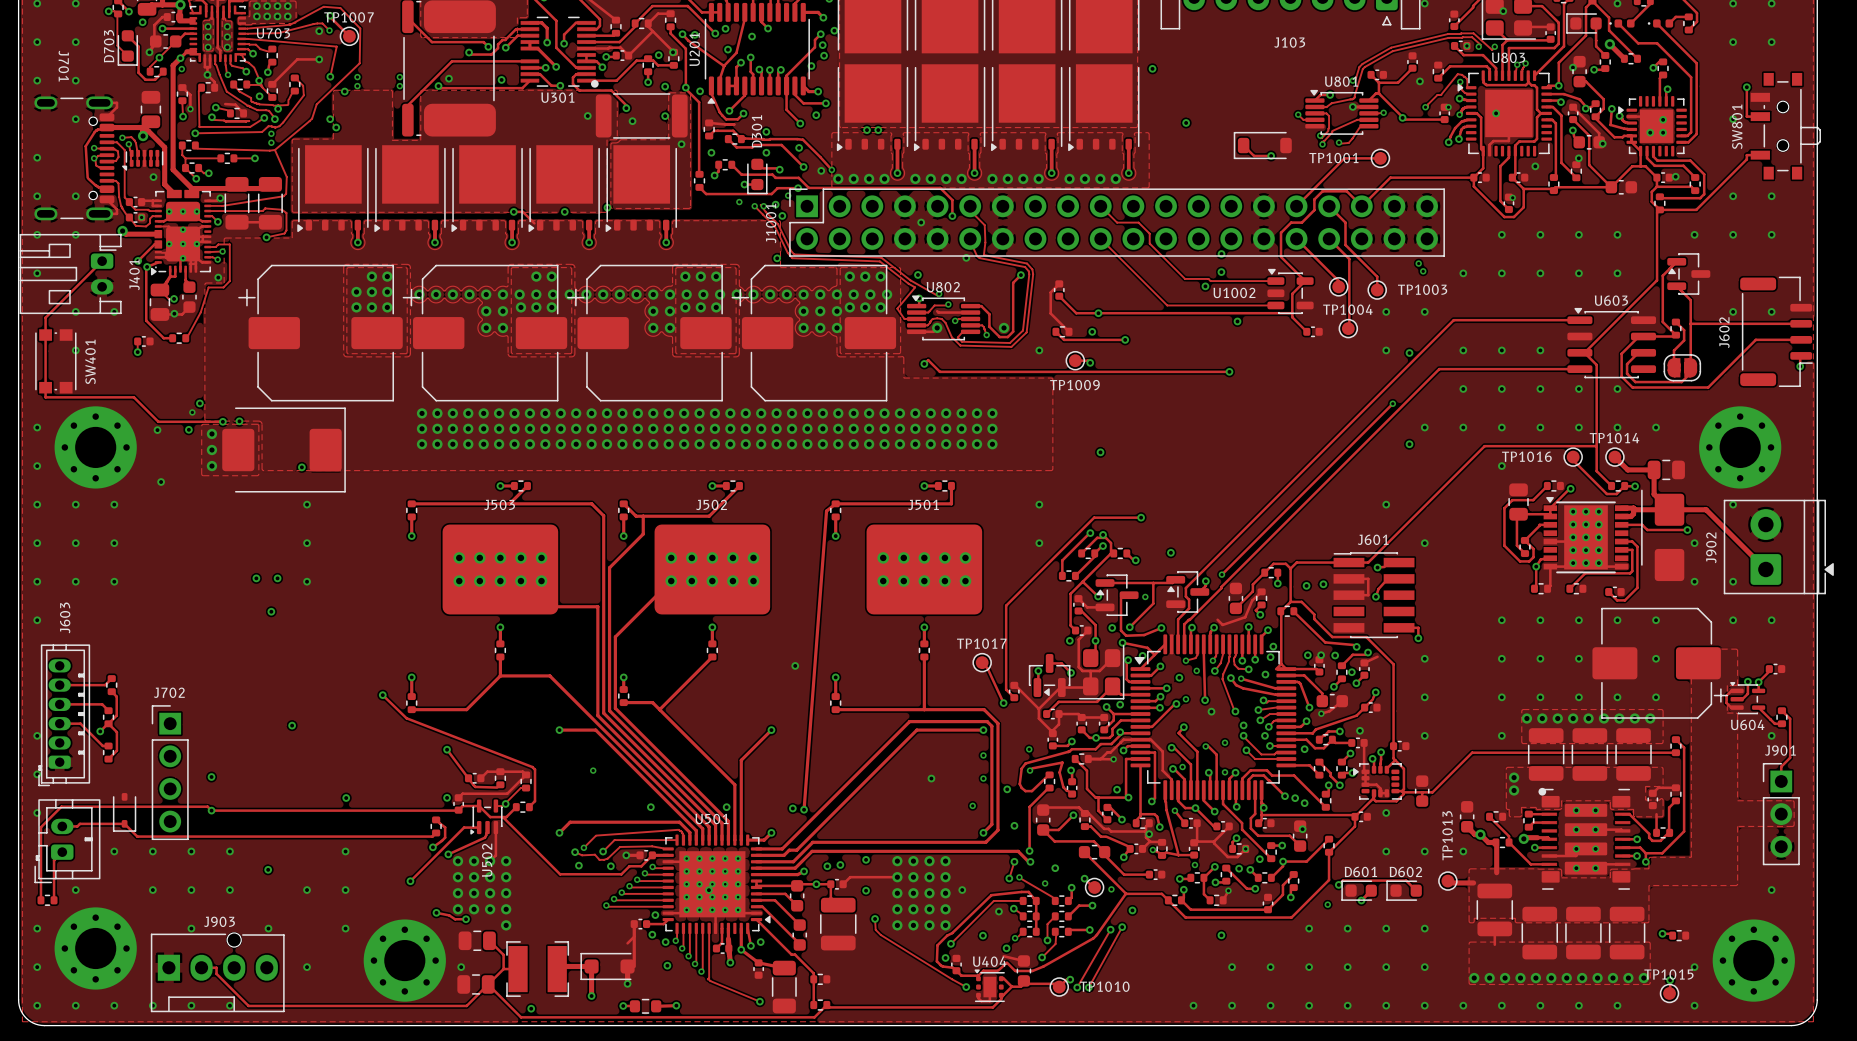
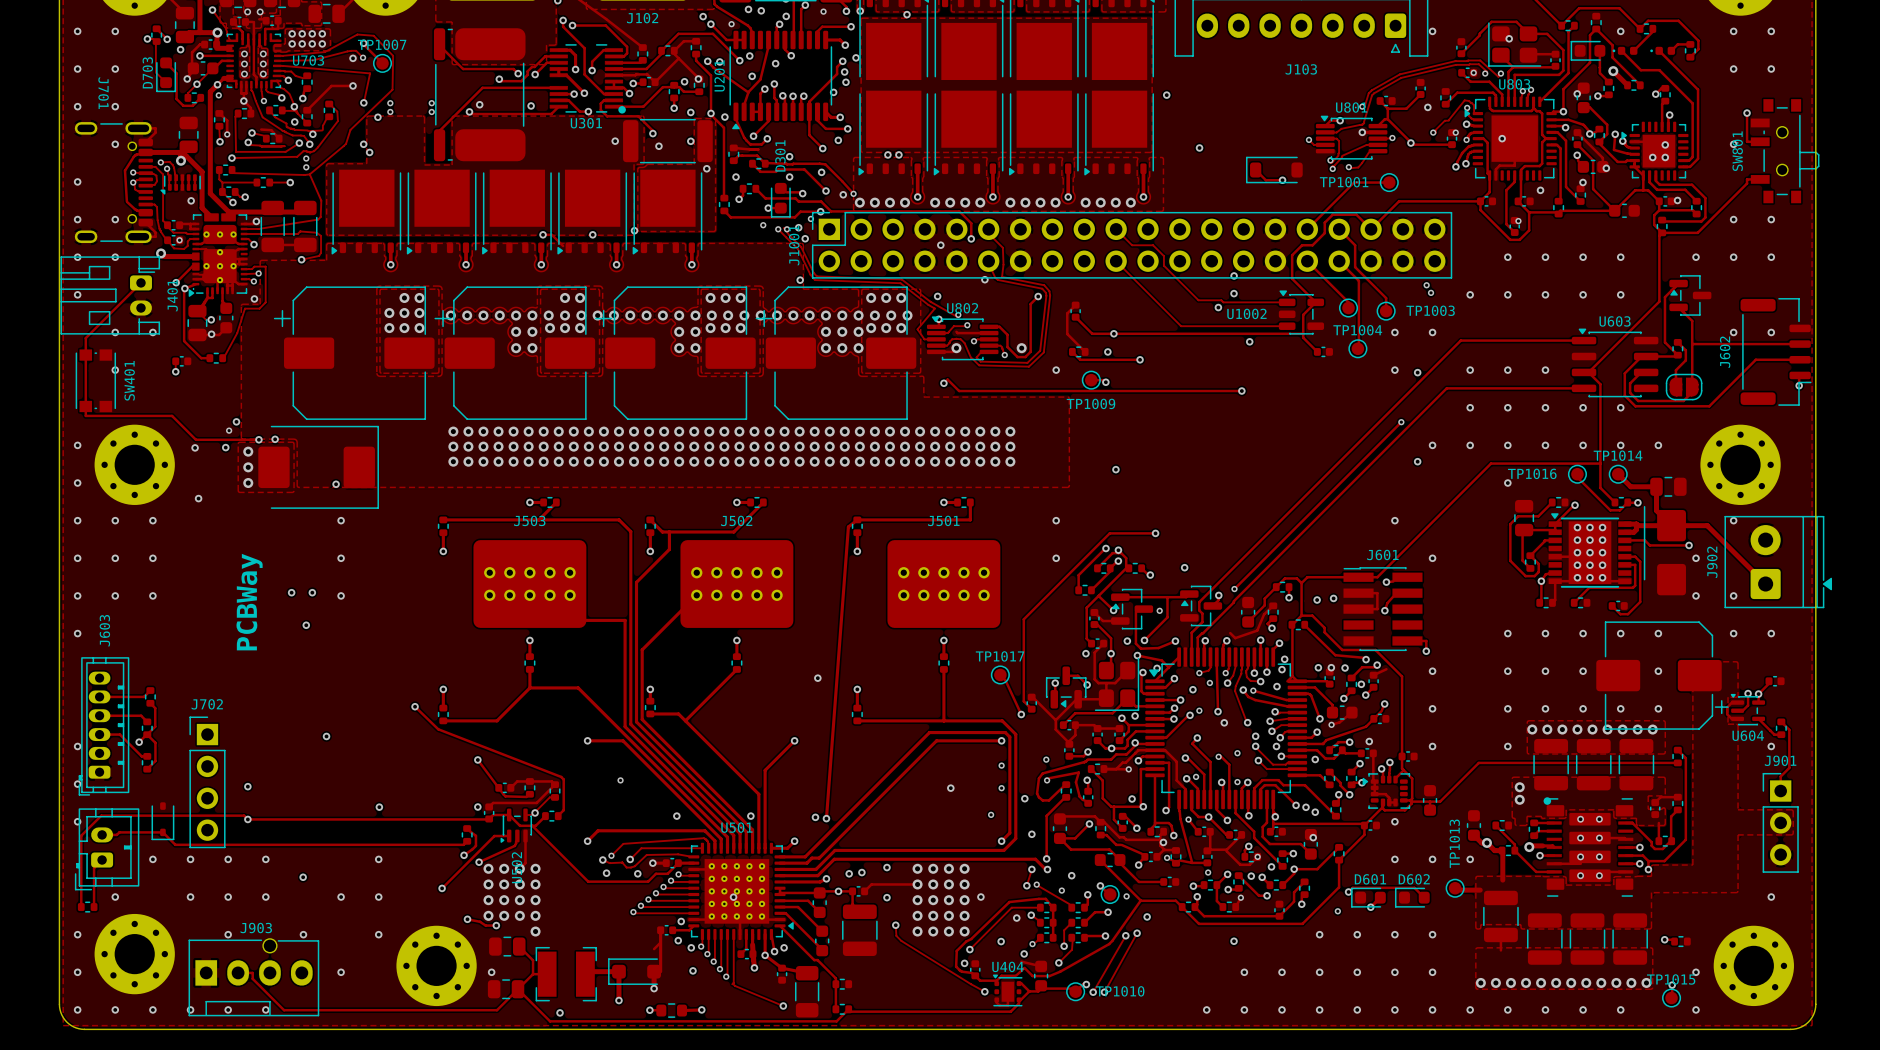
text: none -> PCBWay (249, 602)

